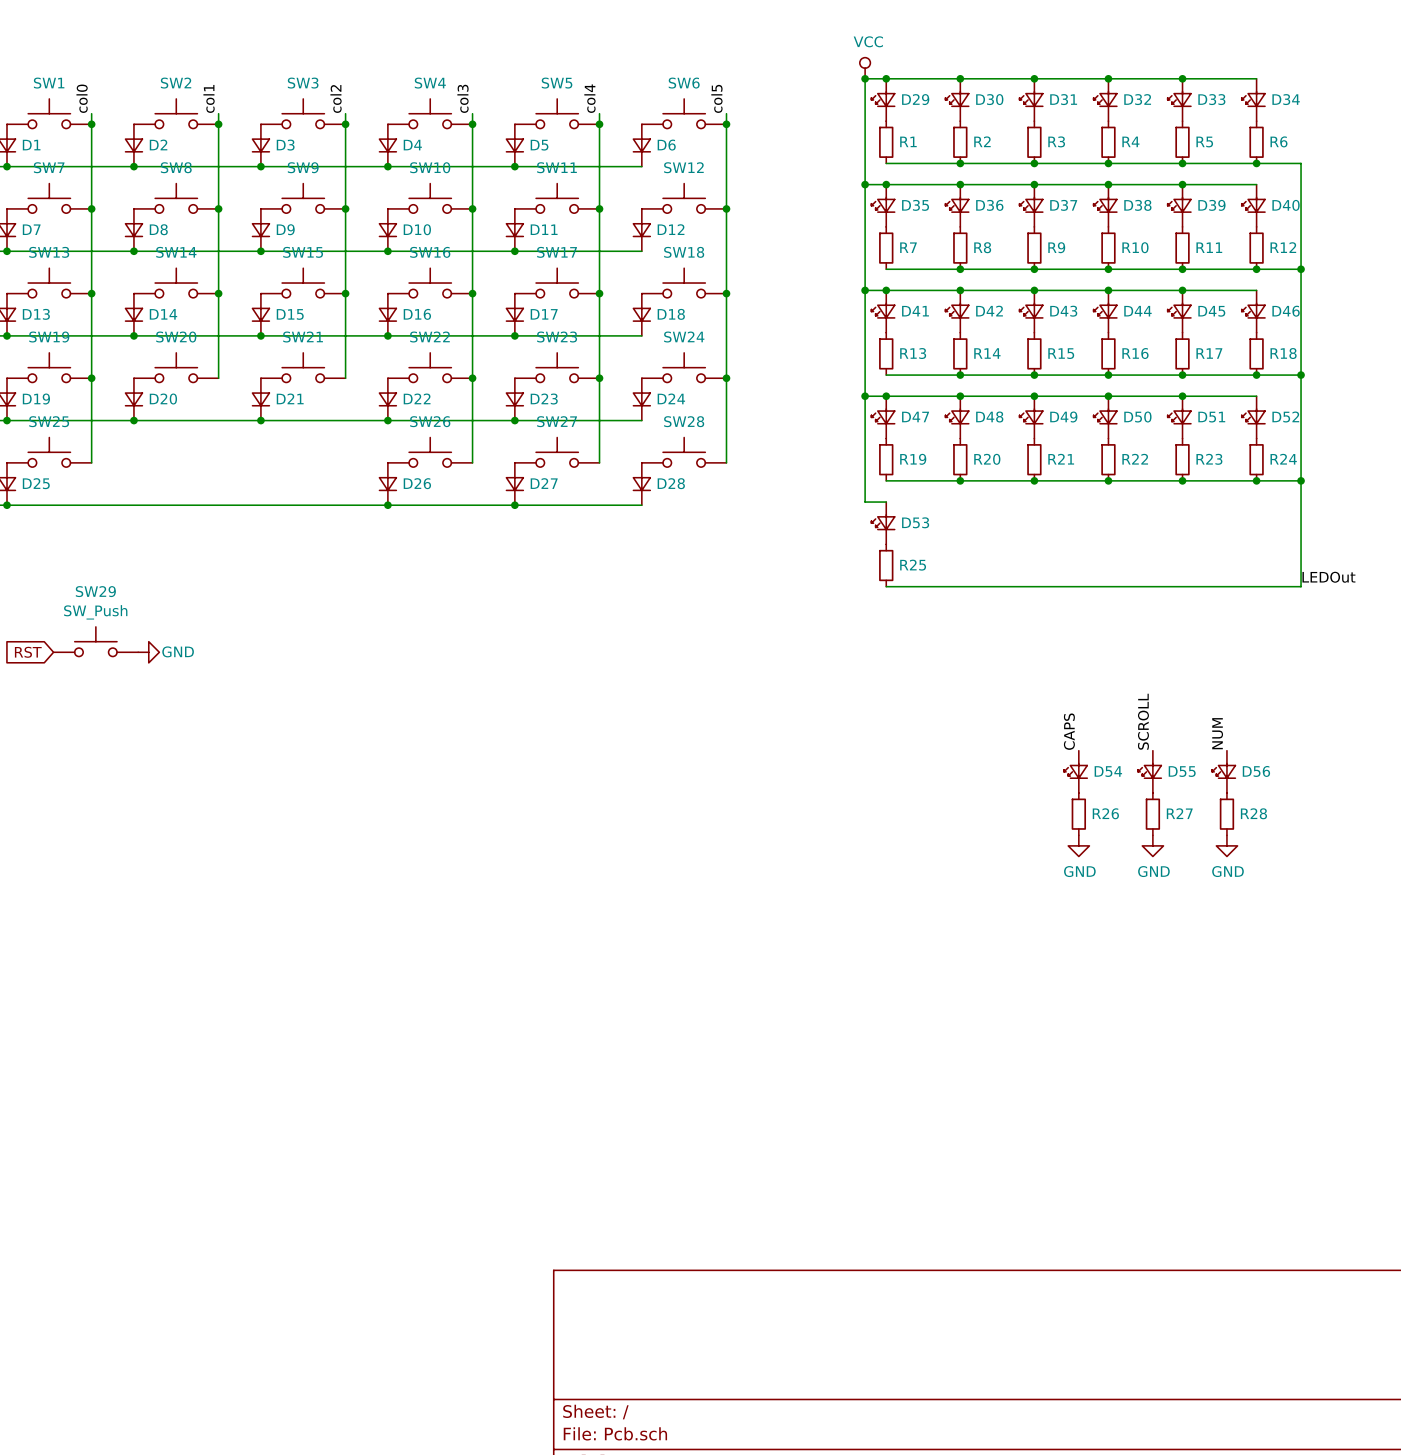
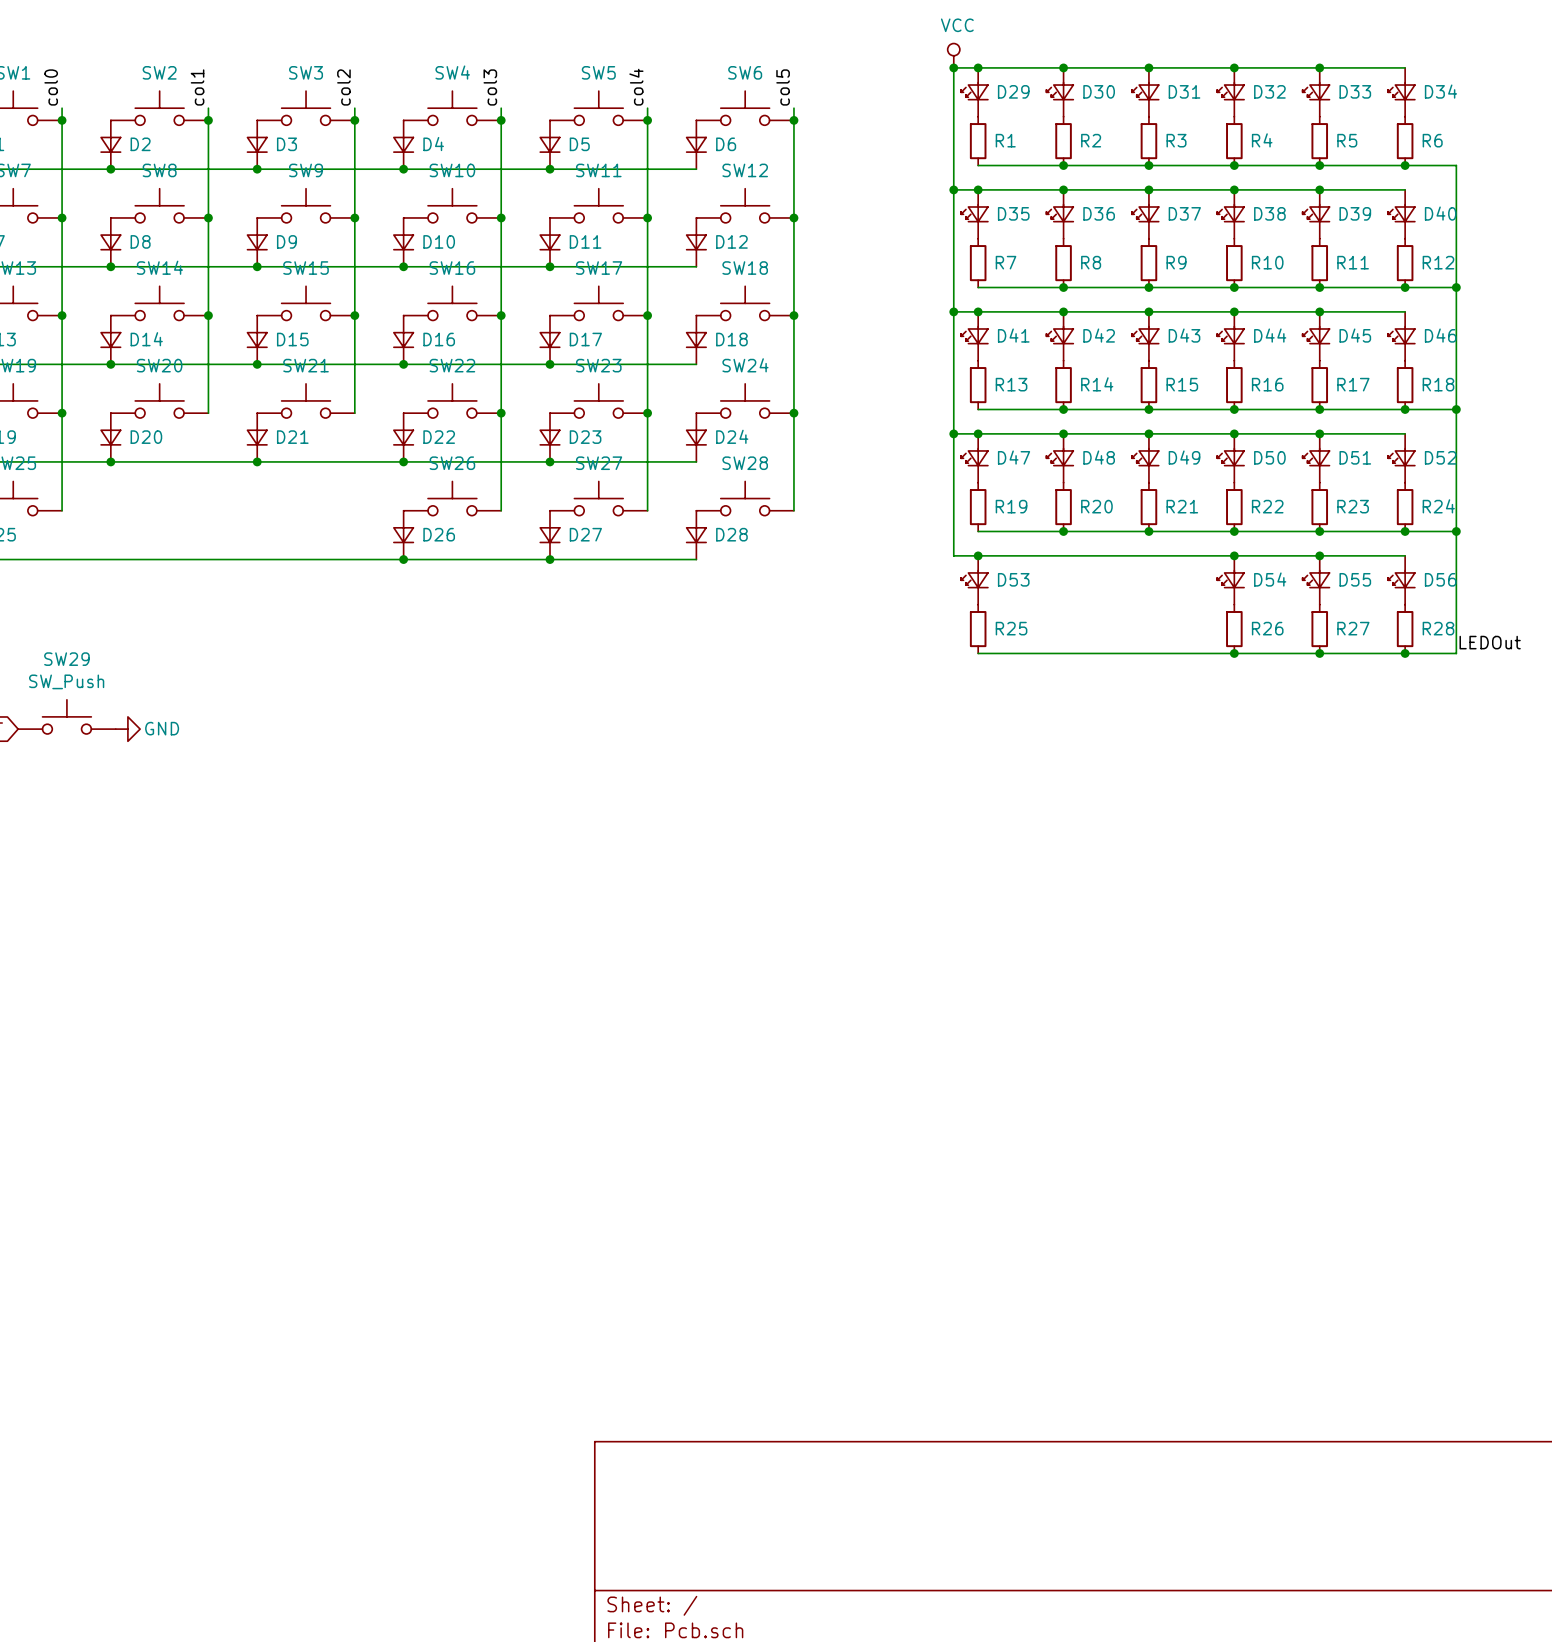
wire: none -> (978, 555) (1405, 555)
junction: none -> (978, 555)
junction: none -> (1234, 555)
junction: none -> (1319, 555)
junction: none -> (1234, 653)
junction: none -> (1319, 653)
junction: none -> (1405, 653)
label: SCROLL (1143, 721) -> none
label: CAPS (1069, 731) -> none
label: NUM (1217, 733) -> none
D54 position: (1075, 771) -> (1230, 580)
D55 position: (1149, 771) -> (1316, 580)
D56 position: (1223, 771) -> (1401, 580)
R26 position: (1078, 814) -> (1234, 629)
R27 position: (1152, 814) -> (1319, 629)
R28 position: (1226, 814) -> (1405, 629)
power symbol: GND (1078, 845) -> none
power symbol: GND (1152, 845) -> none
power symbol: GND (1226, 845) -> none

